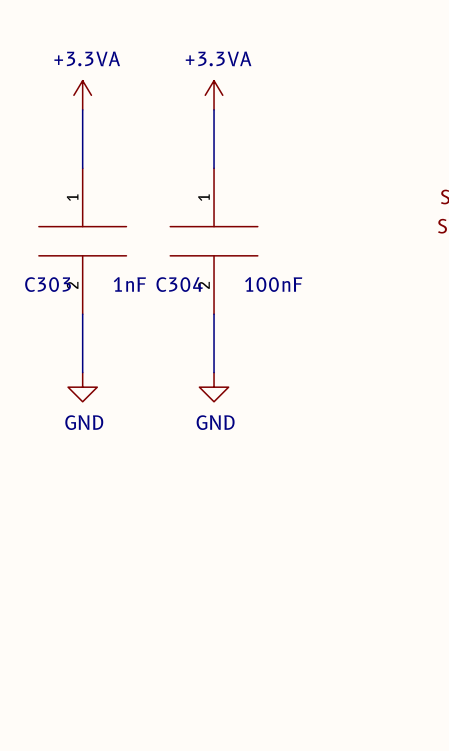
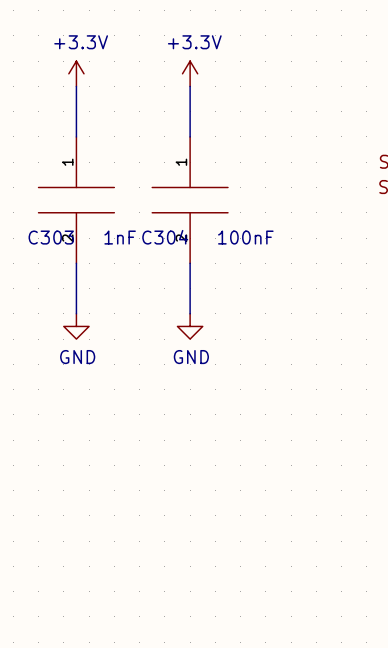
power symbol: +3.3VA (82, 95) -> +3.3V (76, 73)
power symbol: +3.3VA (214, 95) -> +3.3V (190, 73)

